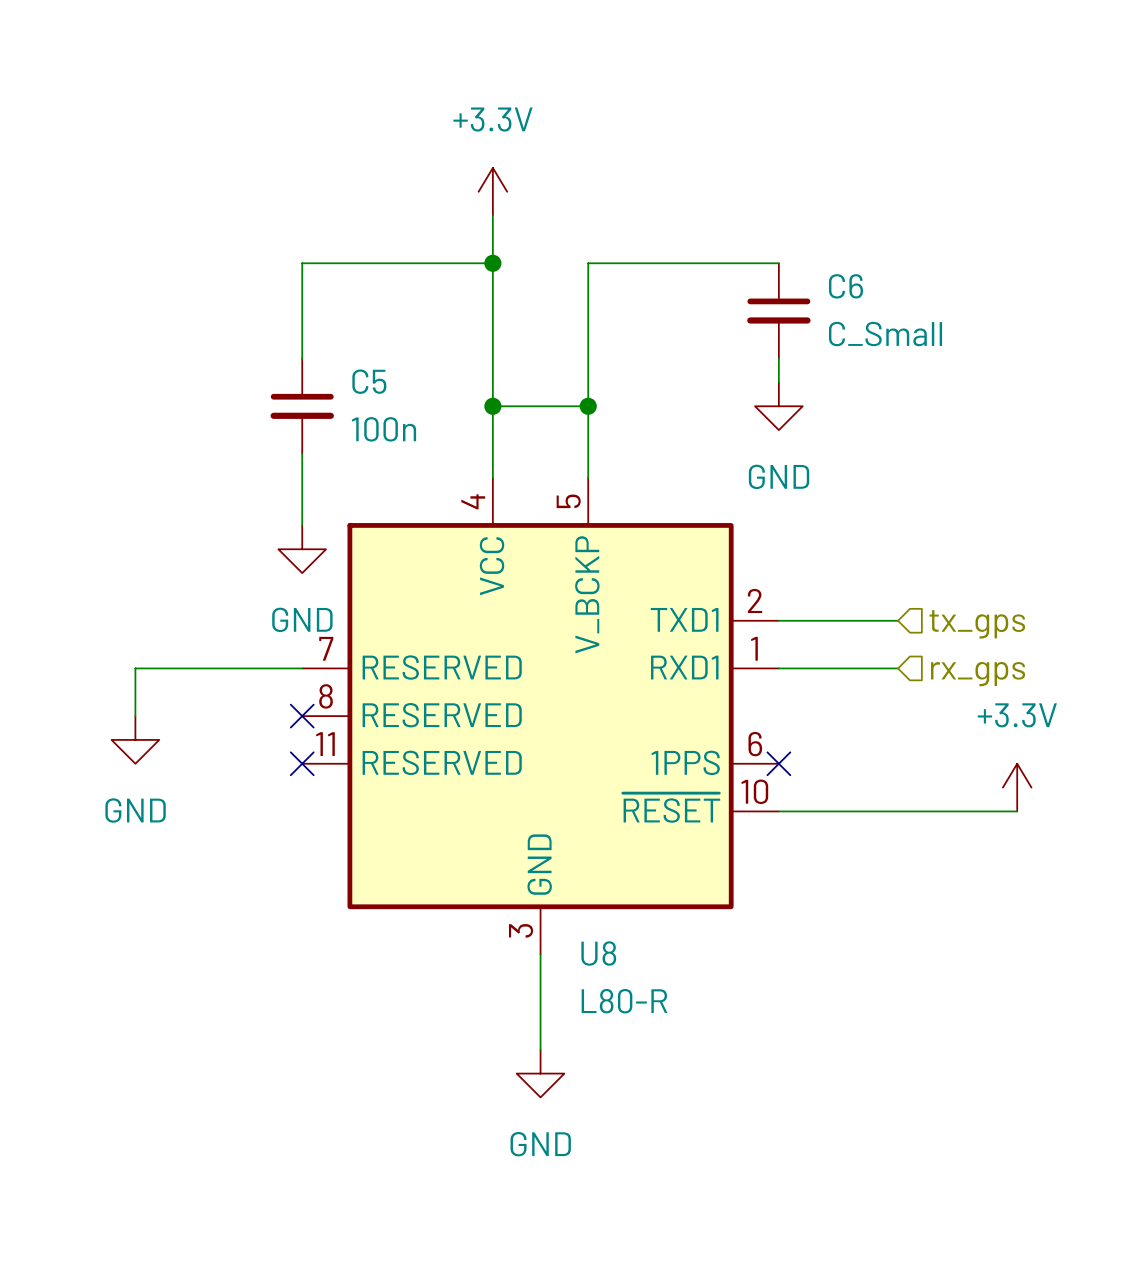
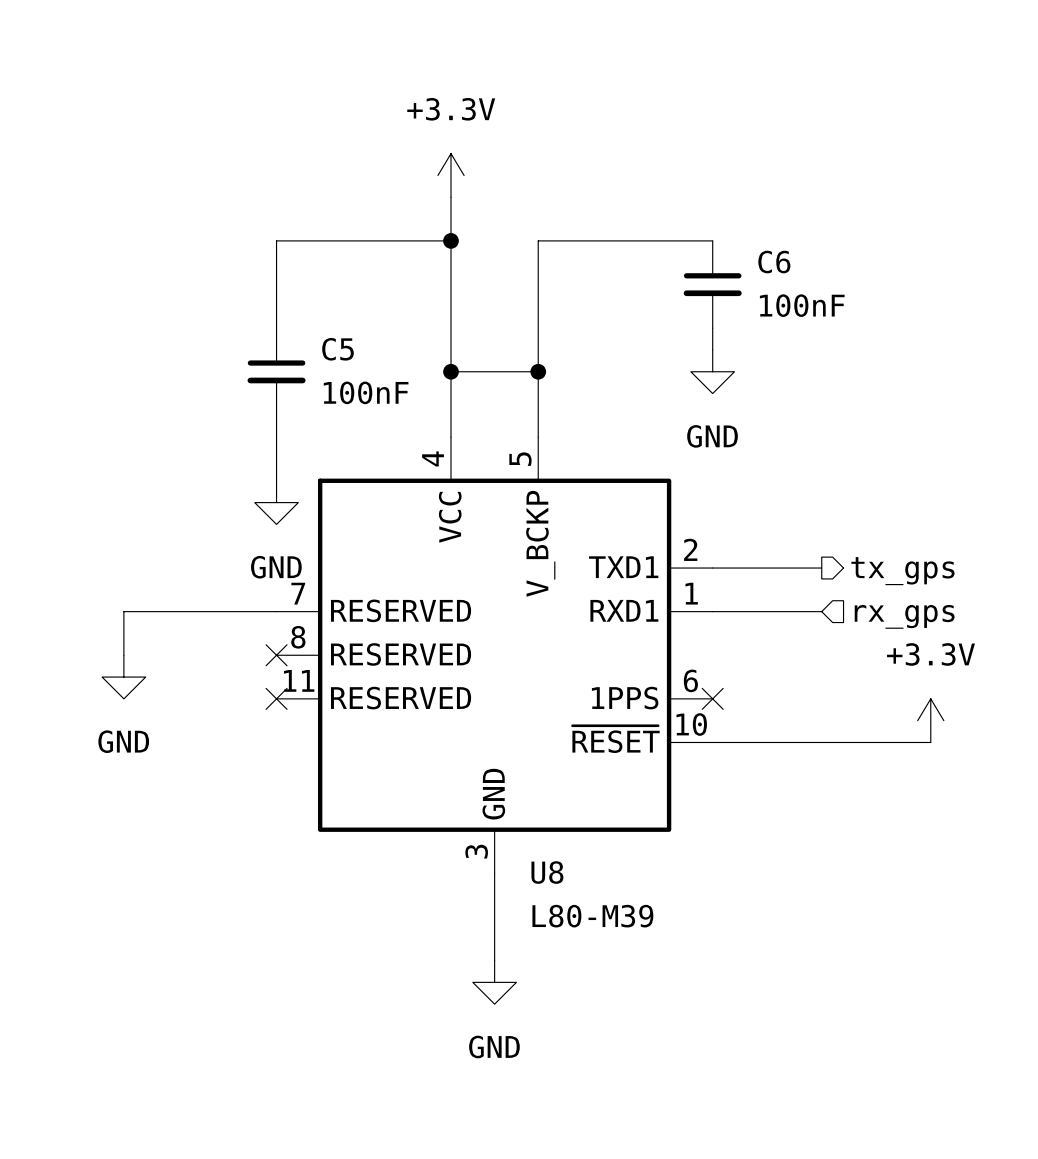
C6 value: C_Small (885, 334) -> 100nF (802, 305)
C5 value: 100n (383, 429) -> 100nF (366, 392)
hierarchical label shape: input (977, 624) -> output (902, 571)
U8 value: L80-R (624, 1001) -> L80-M39 (592, 916)

